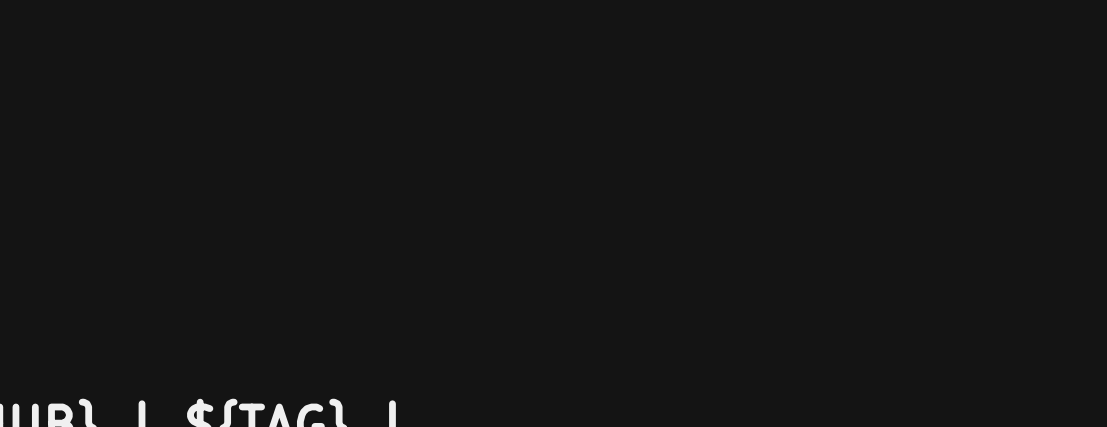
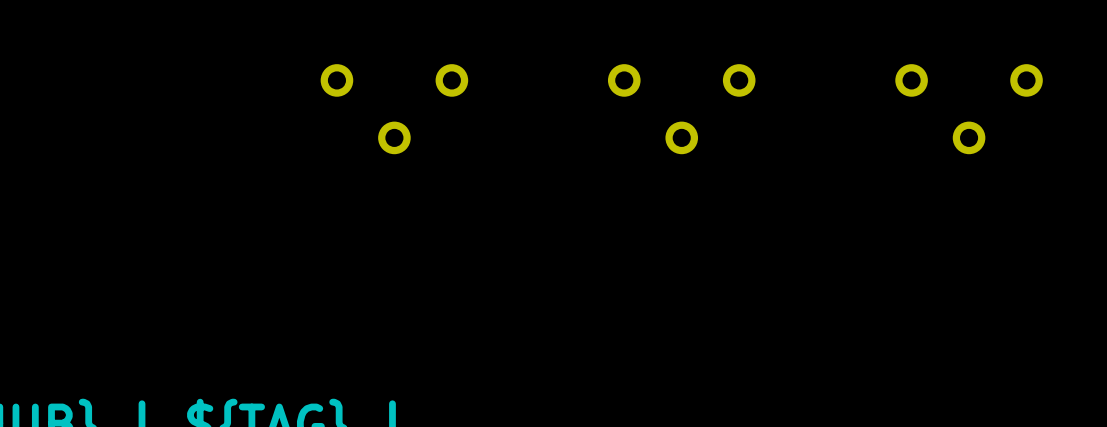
part: none -> (394, 109)
part: none -> (681, 109)
part: none -> (969, 109)

